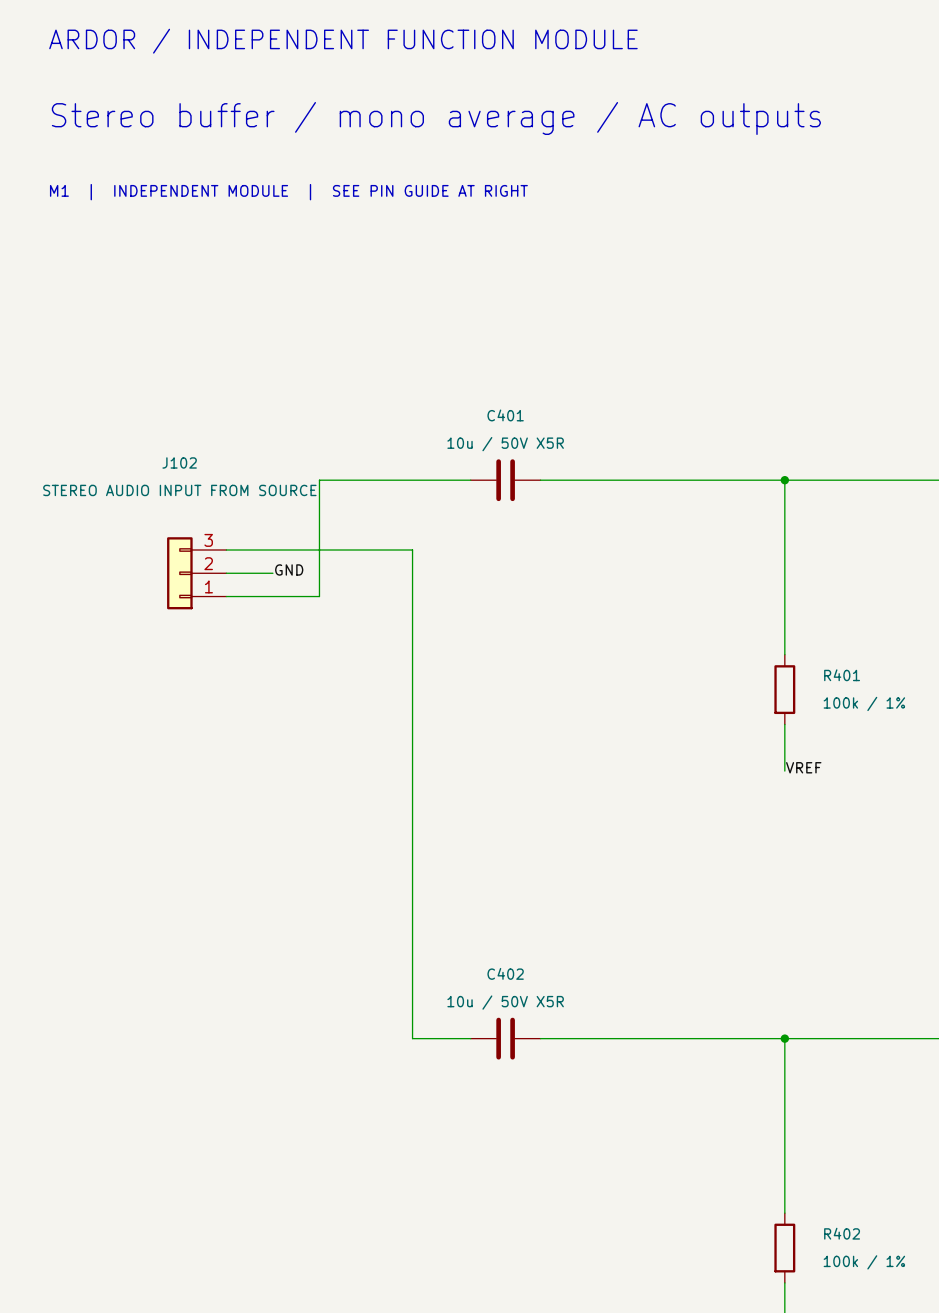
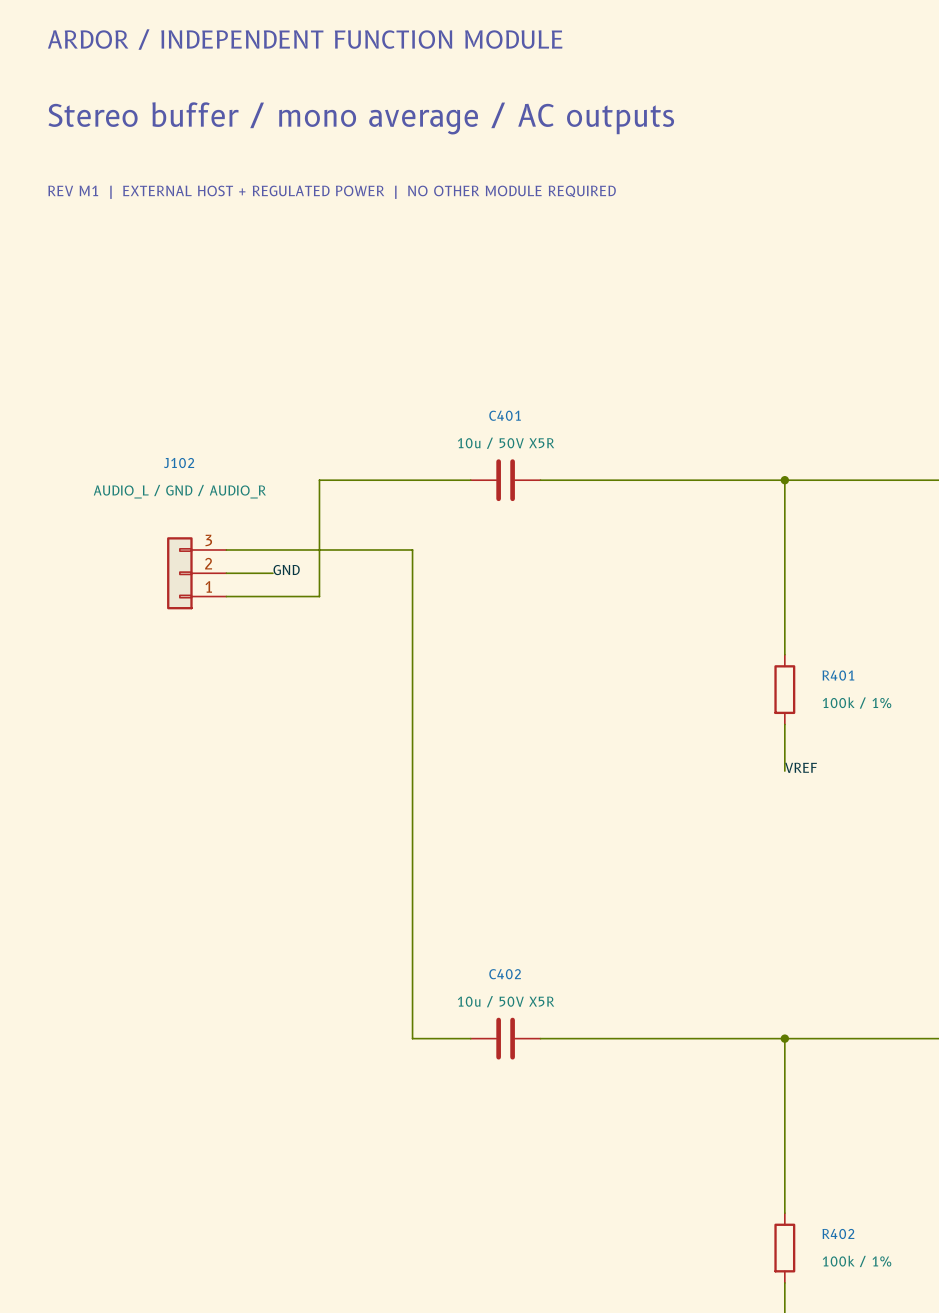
text: M1 | INDEPENDENT MODULE | SEE PIN GUIDE AT RIGHT (288, 192) -> REV M1 | EXTERNAL HOST + REGULATED POWER | NO OTHER MODULE REQUIRED (332, 192)
J102 value: STEREO AUDIO INPUT FROM SOURCE (179, 490) -> AUDIO_L / GND / AUDIO_R (179, 491)

